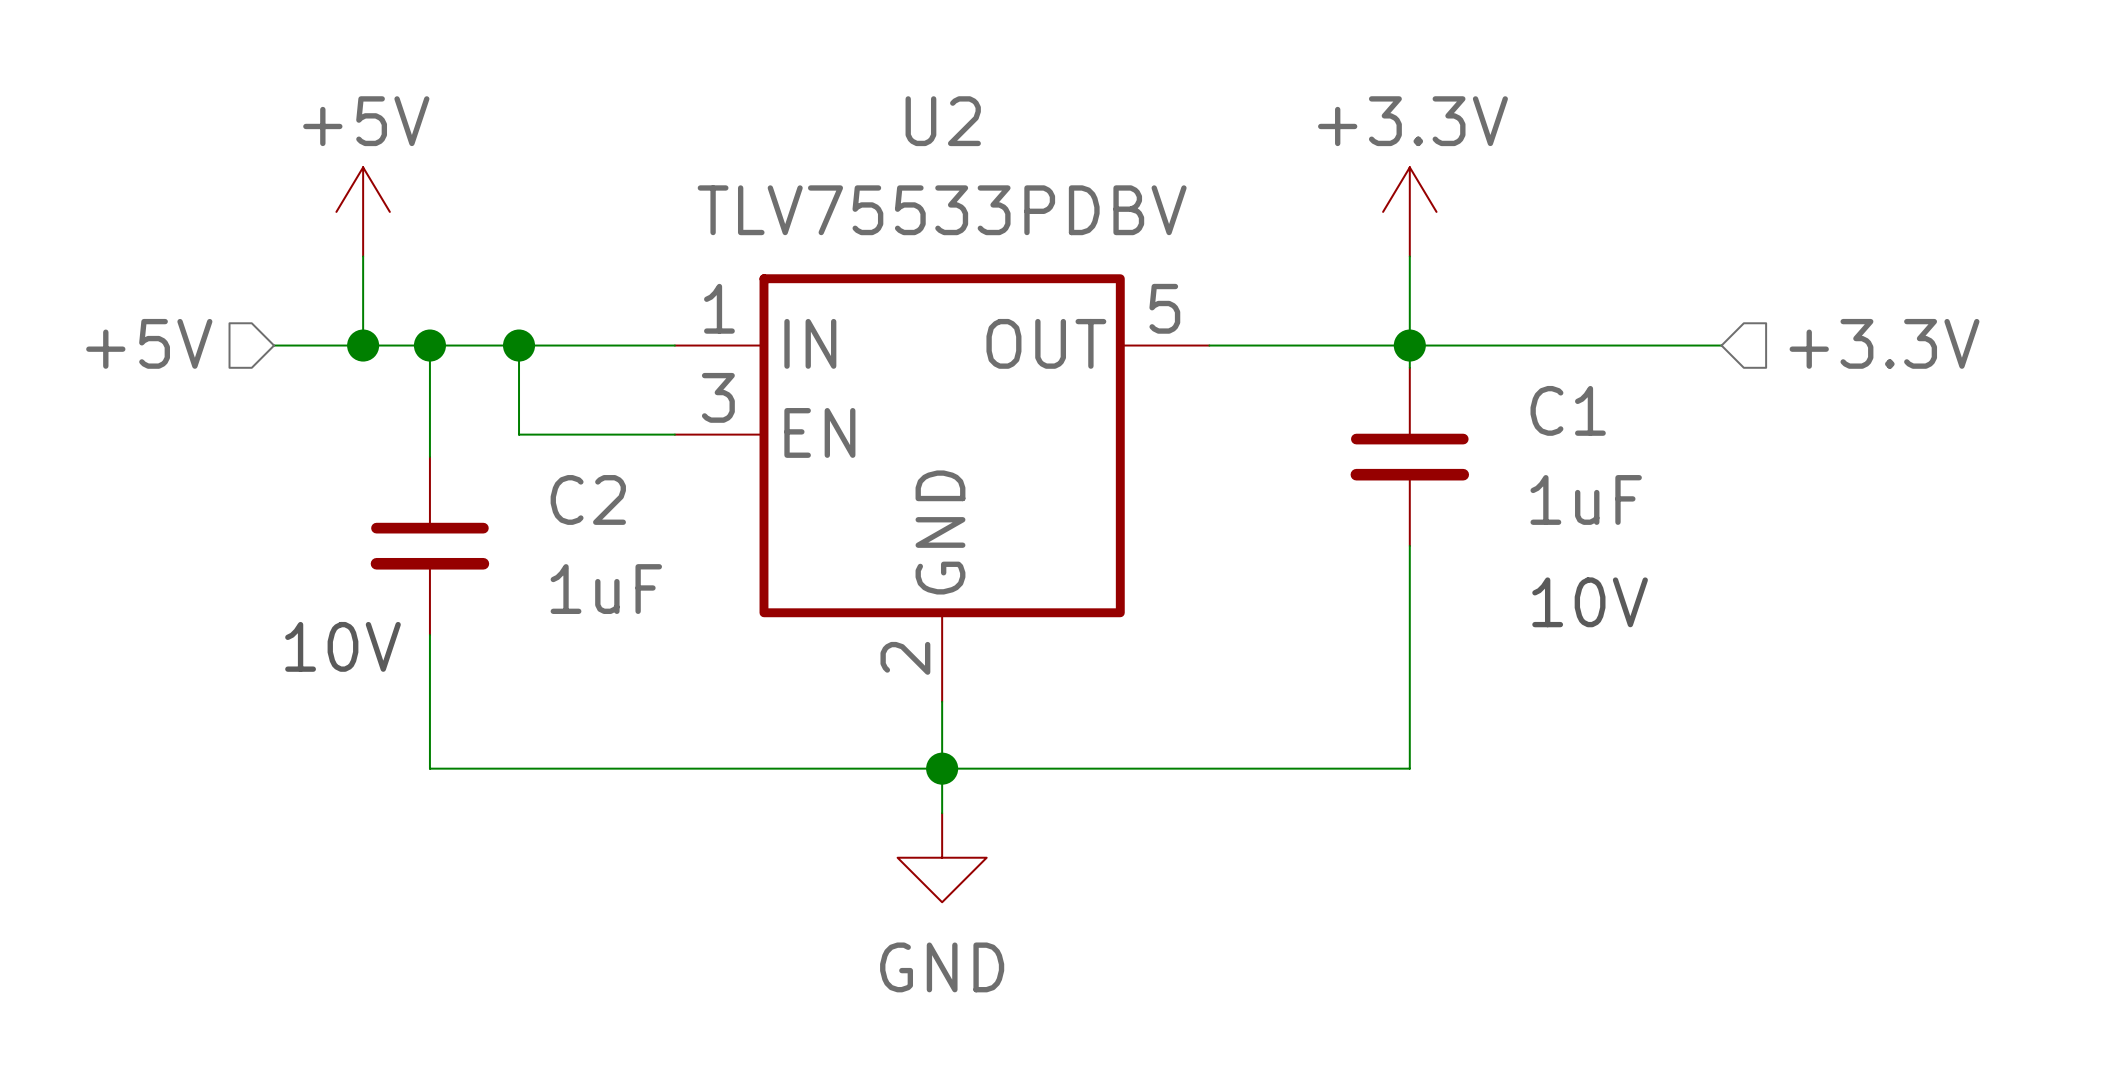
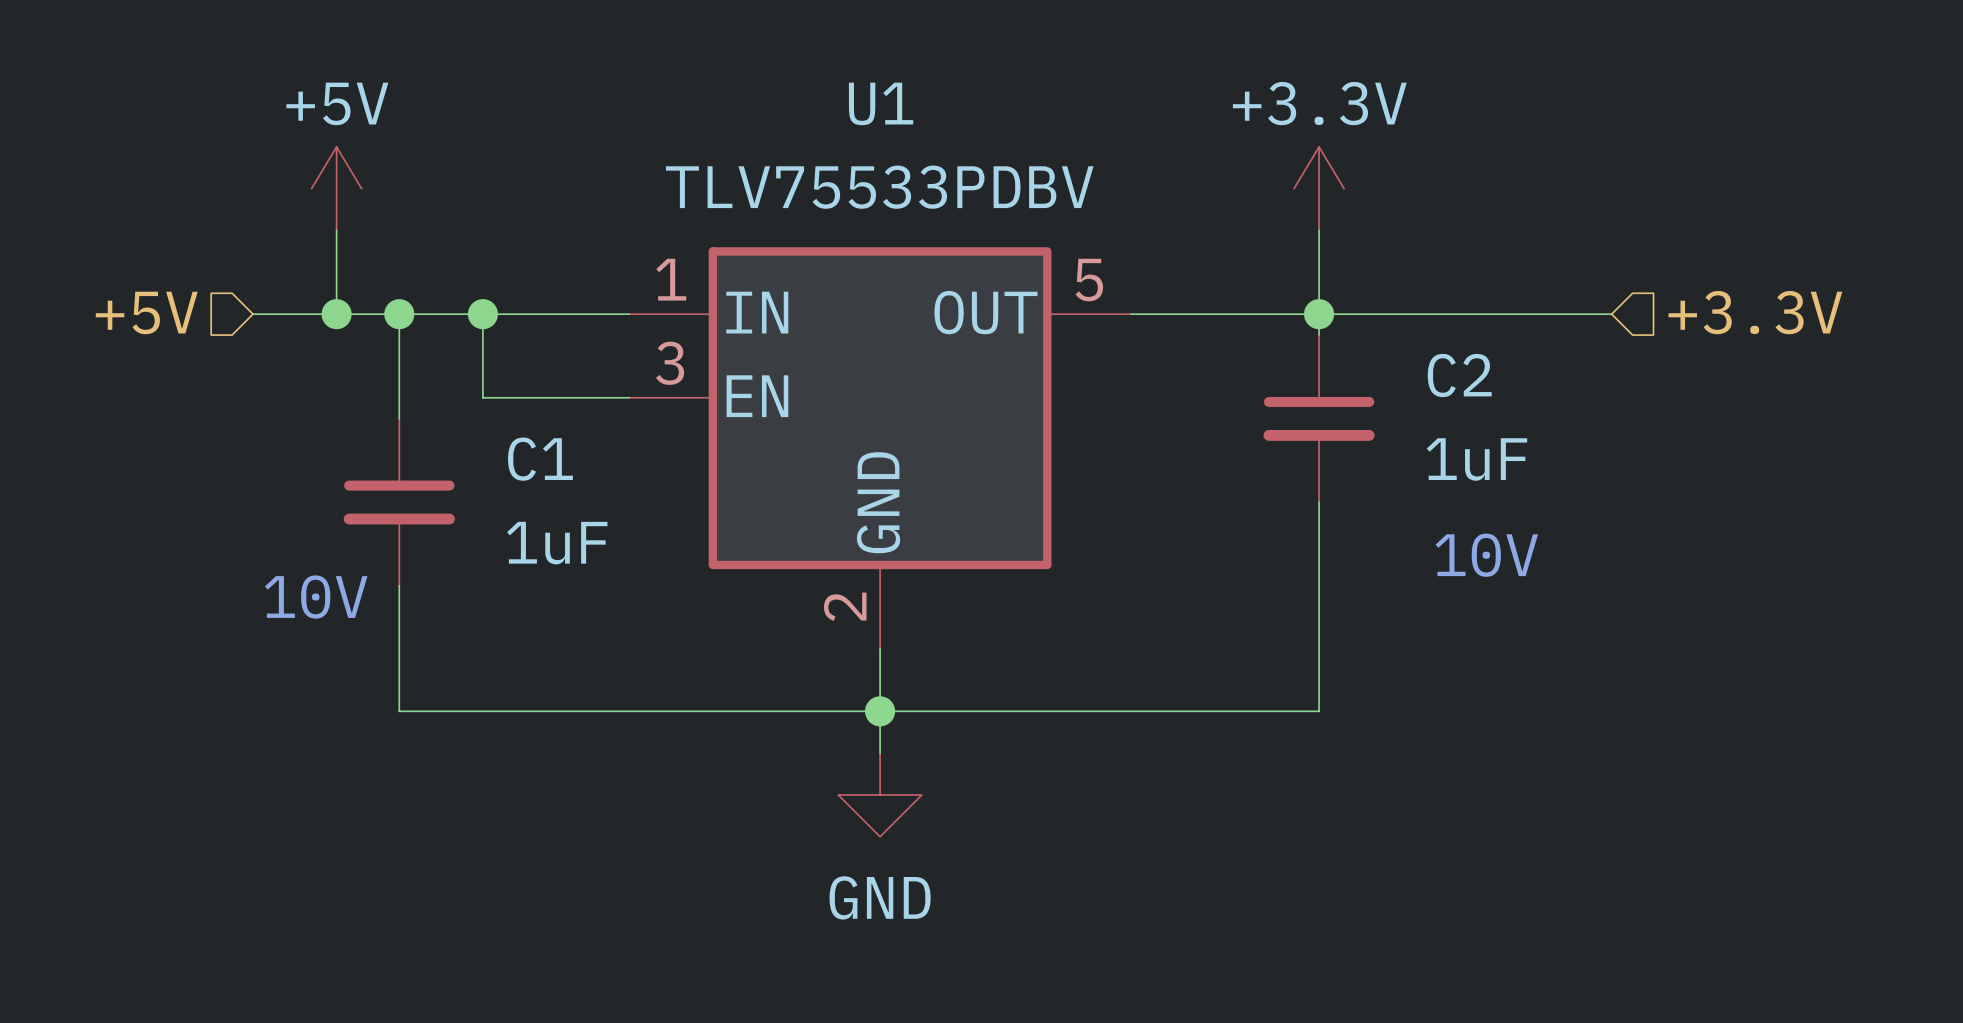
U2 name: U2 (943, 121) -> U1 (881, 103)
C1 name: C1 (1568, 410) -> C2 (1459, 375)
C2 name: C2 (588, 499) -> C1 (540, 459)

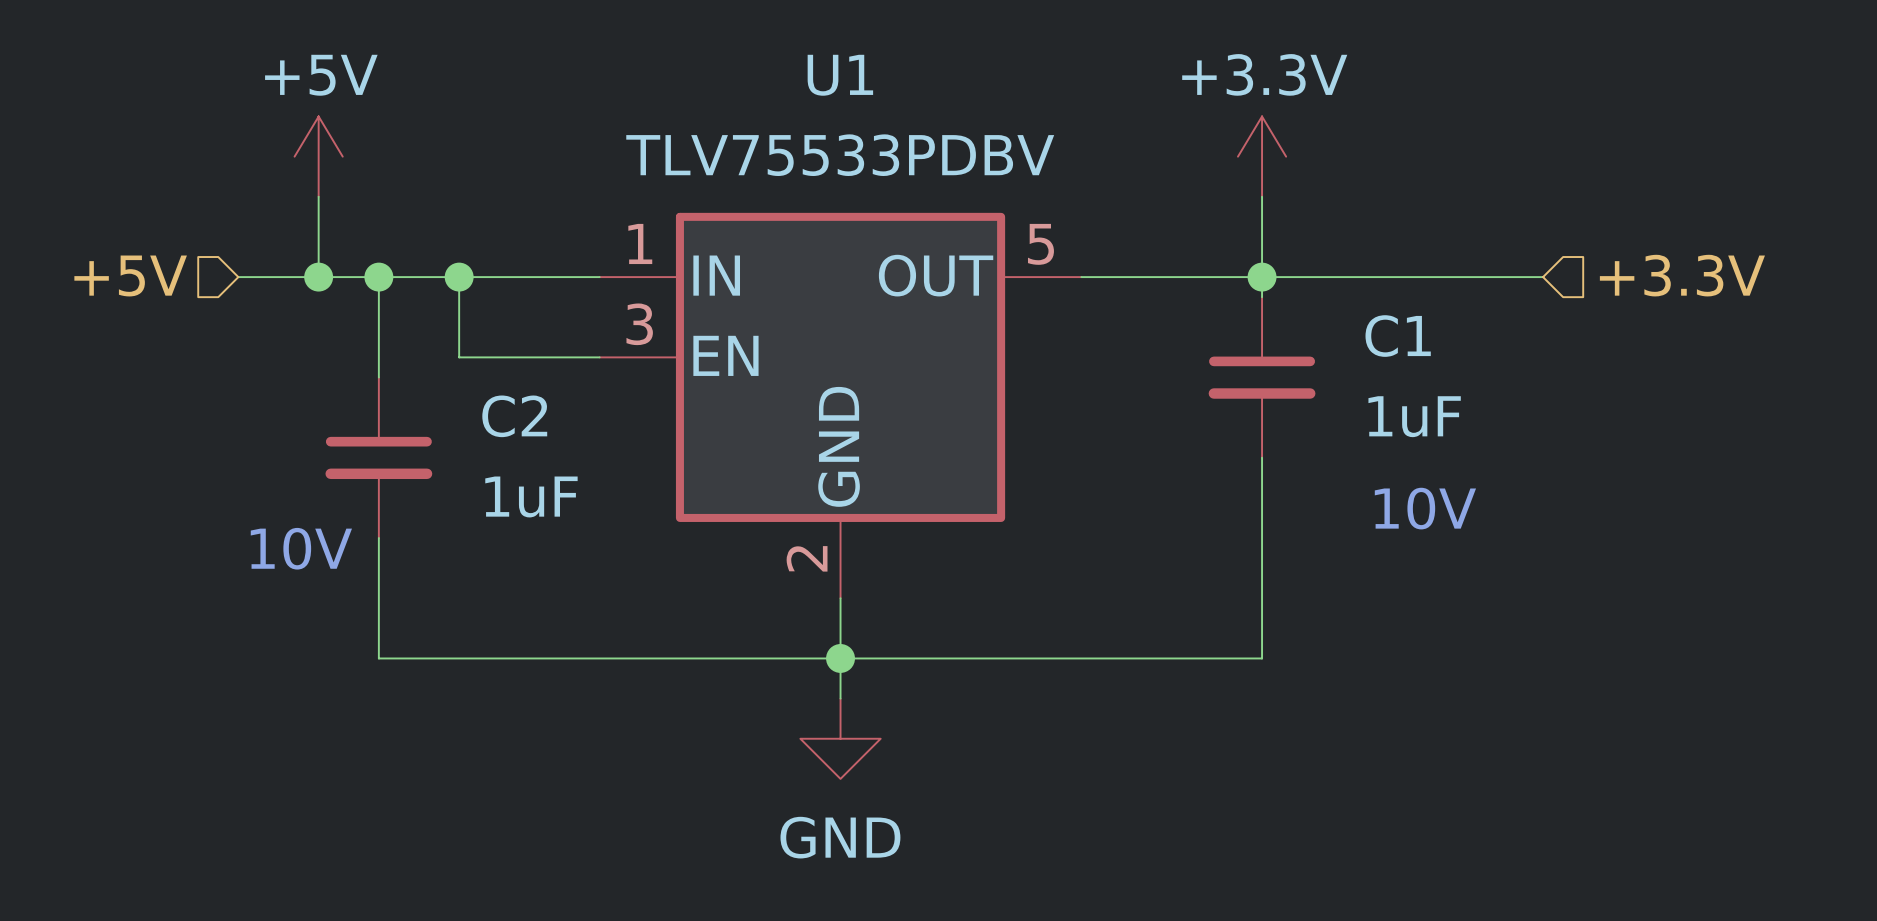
C2 name: C2 (1459, 375) -> C1 (1398, 336)
C1 name: C1 (540, 459) -> C2 (514, 416)

